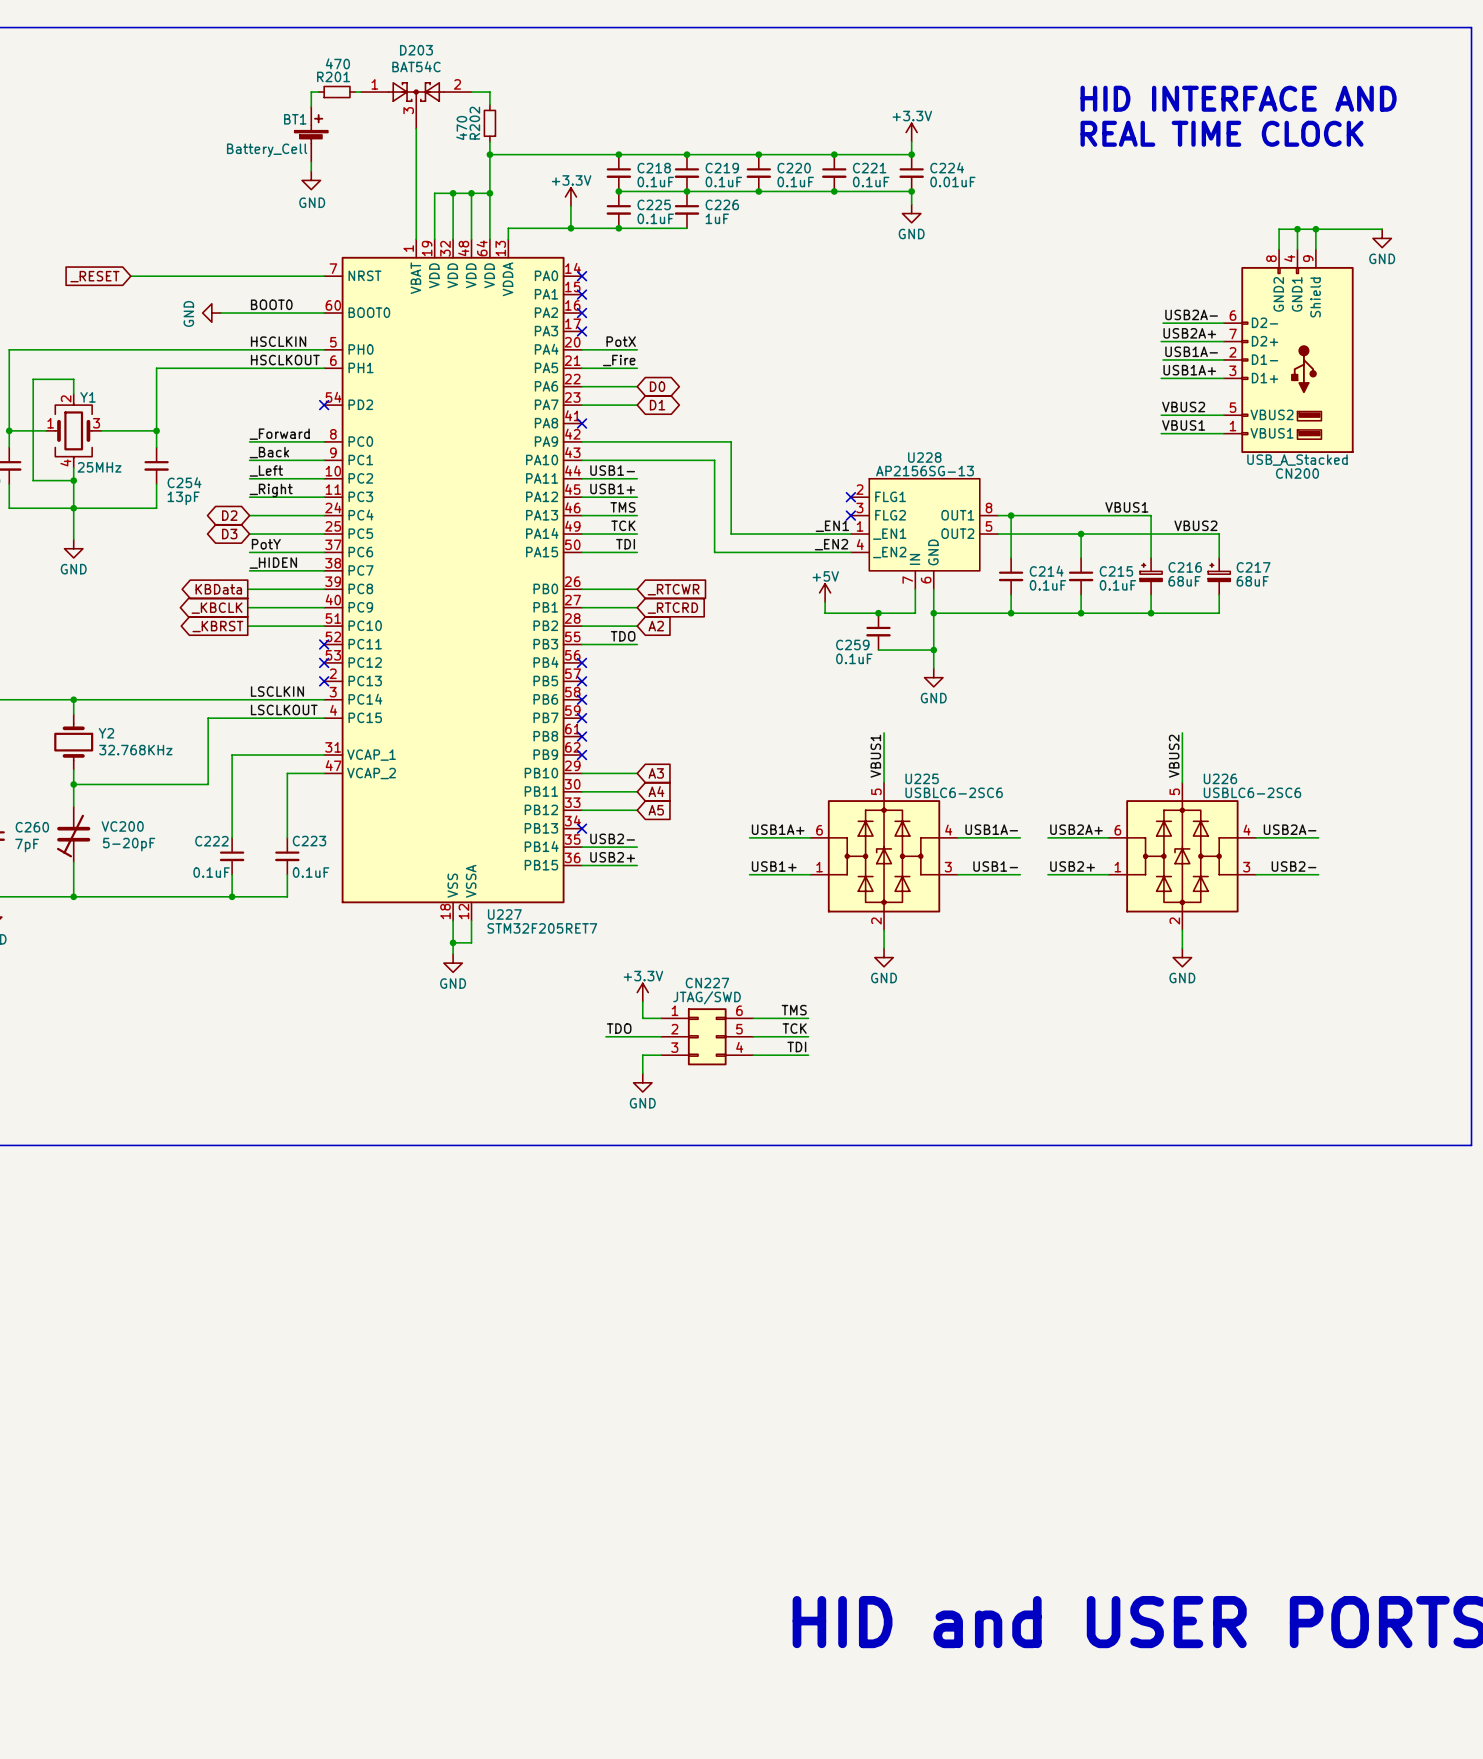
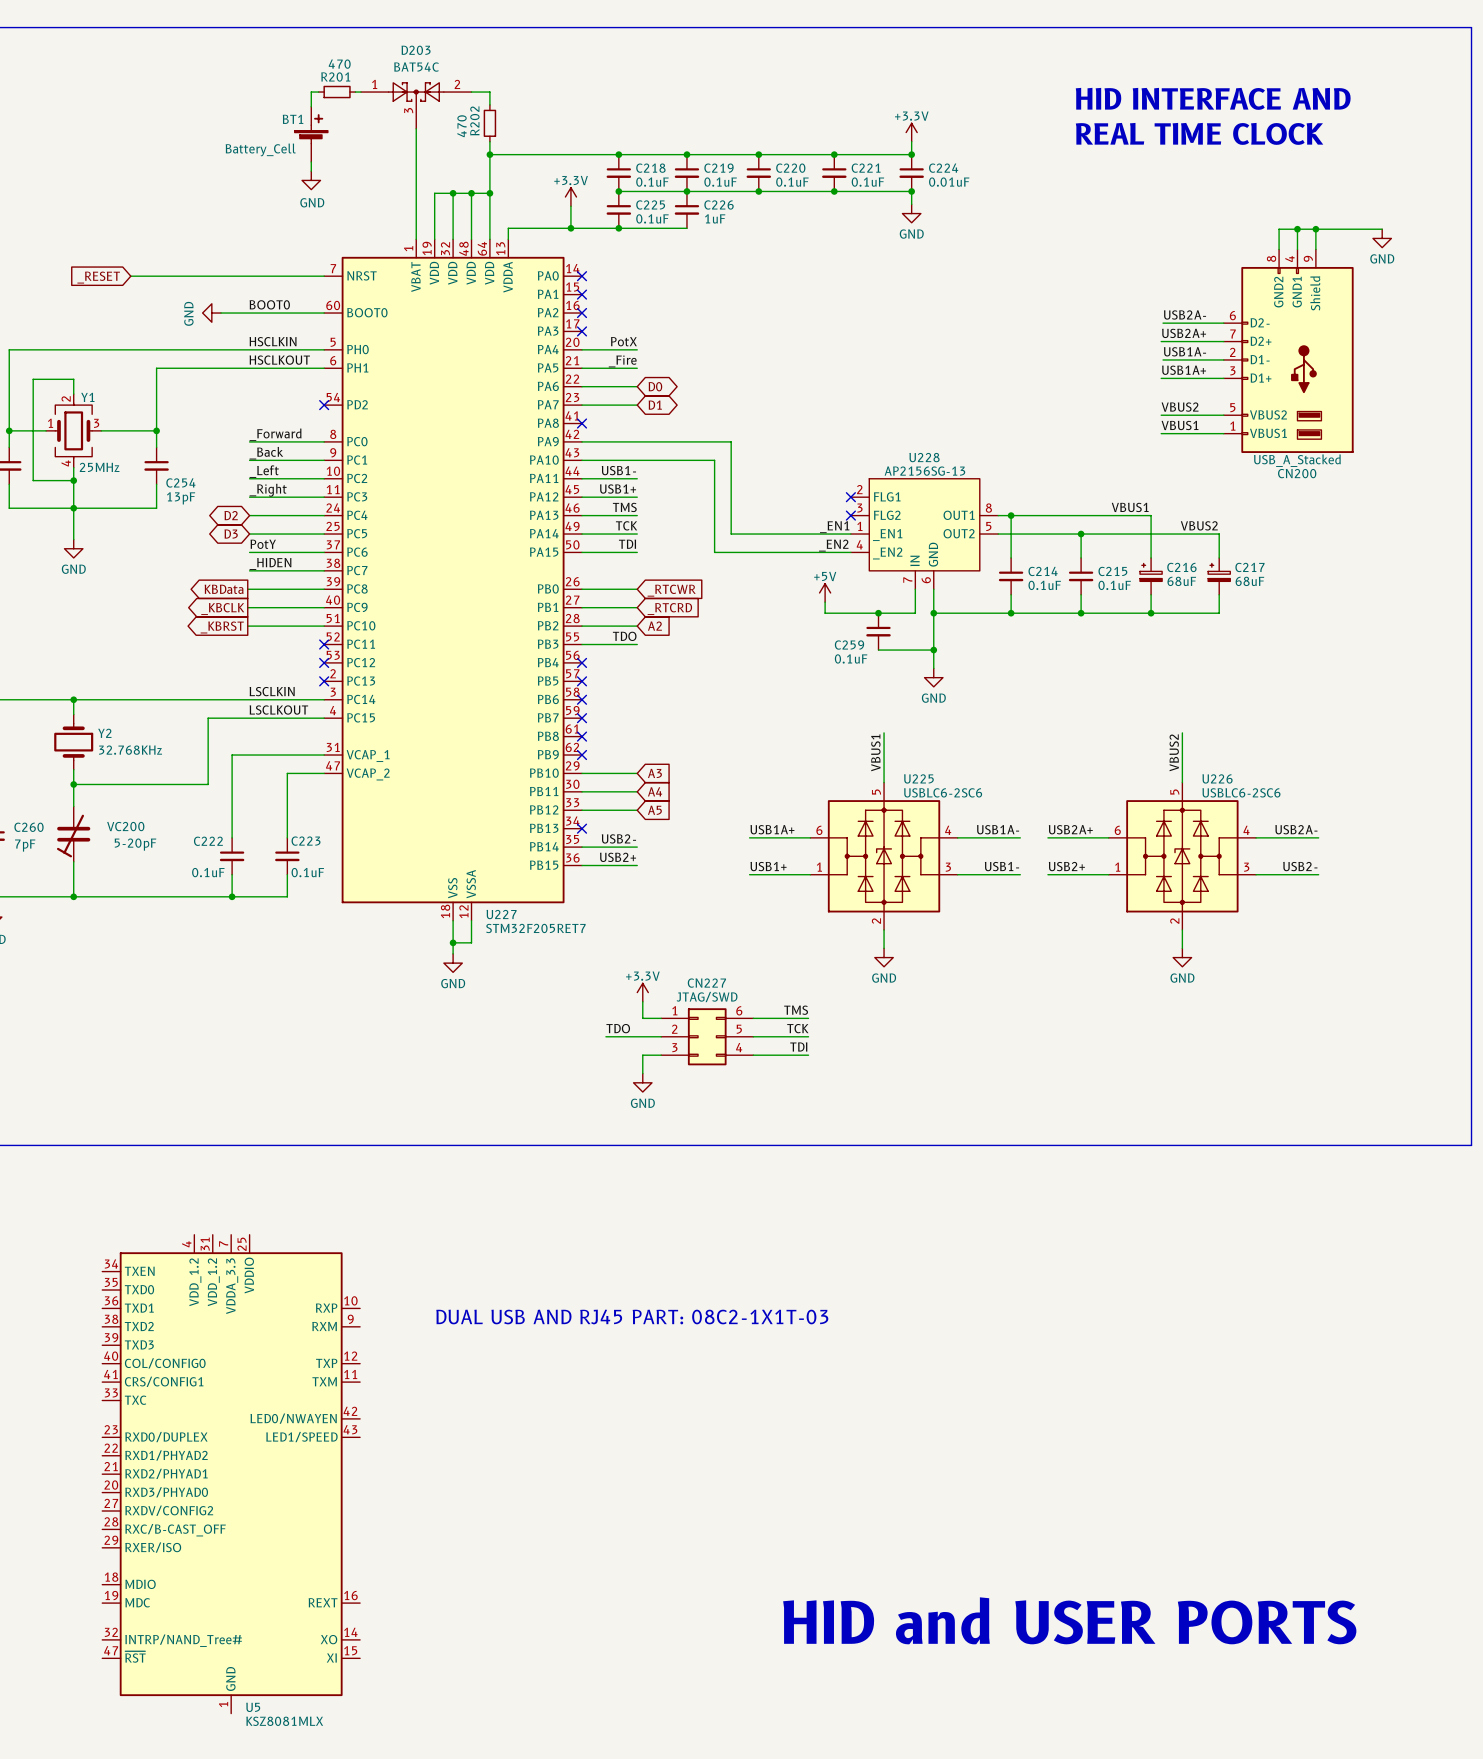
text: none -> DUAL USB AND RJ45 PART: 08C2-1X1T-03 (632, 1317)
U5: none -> KSZ8081MLX (231, 1474)

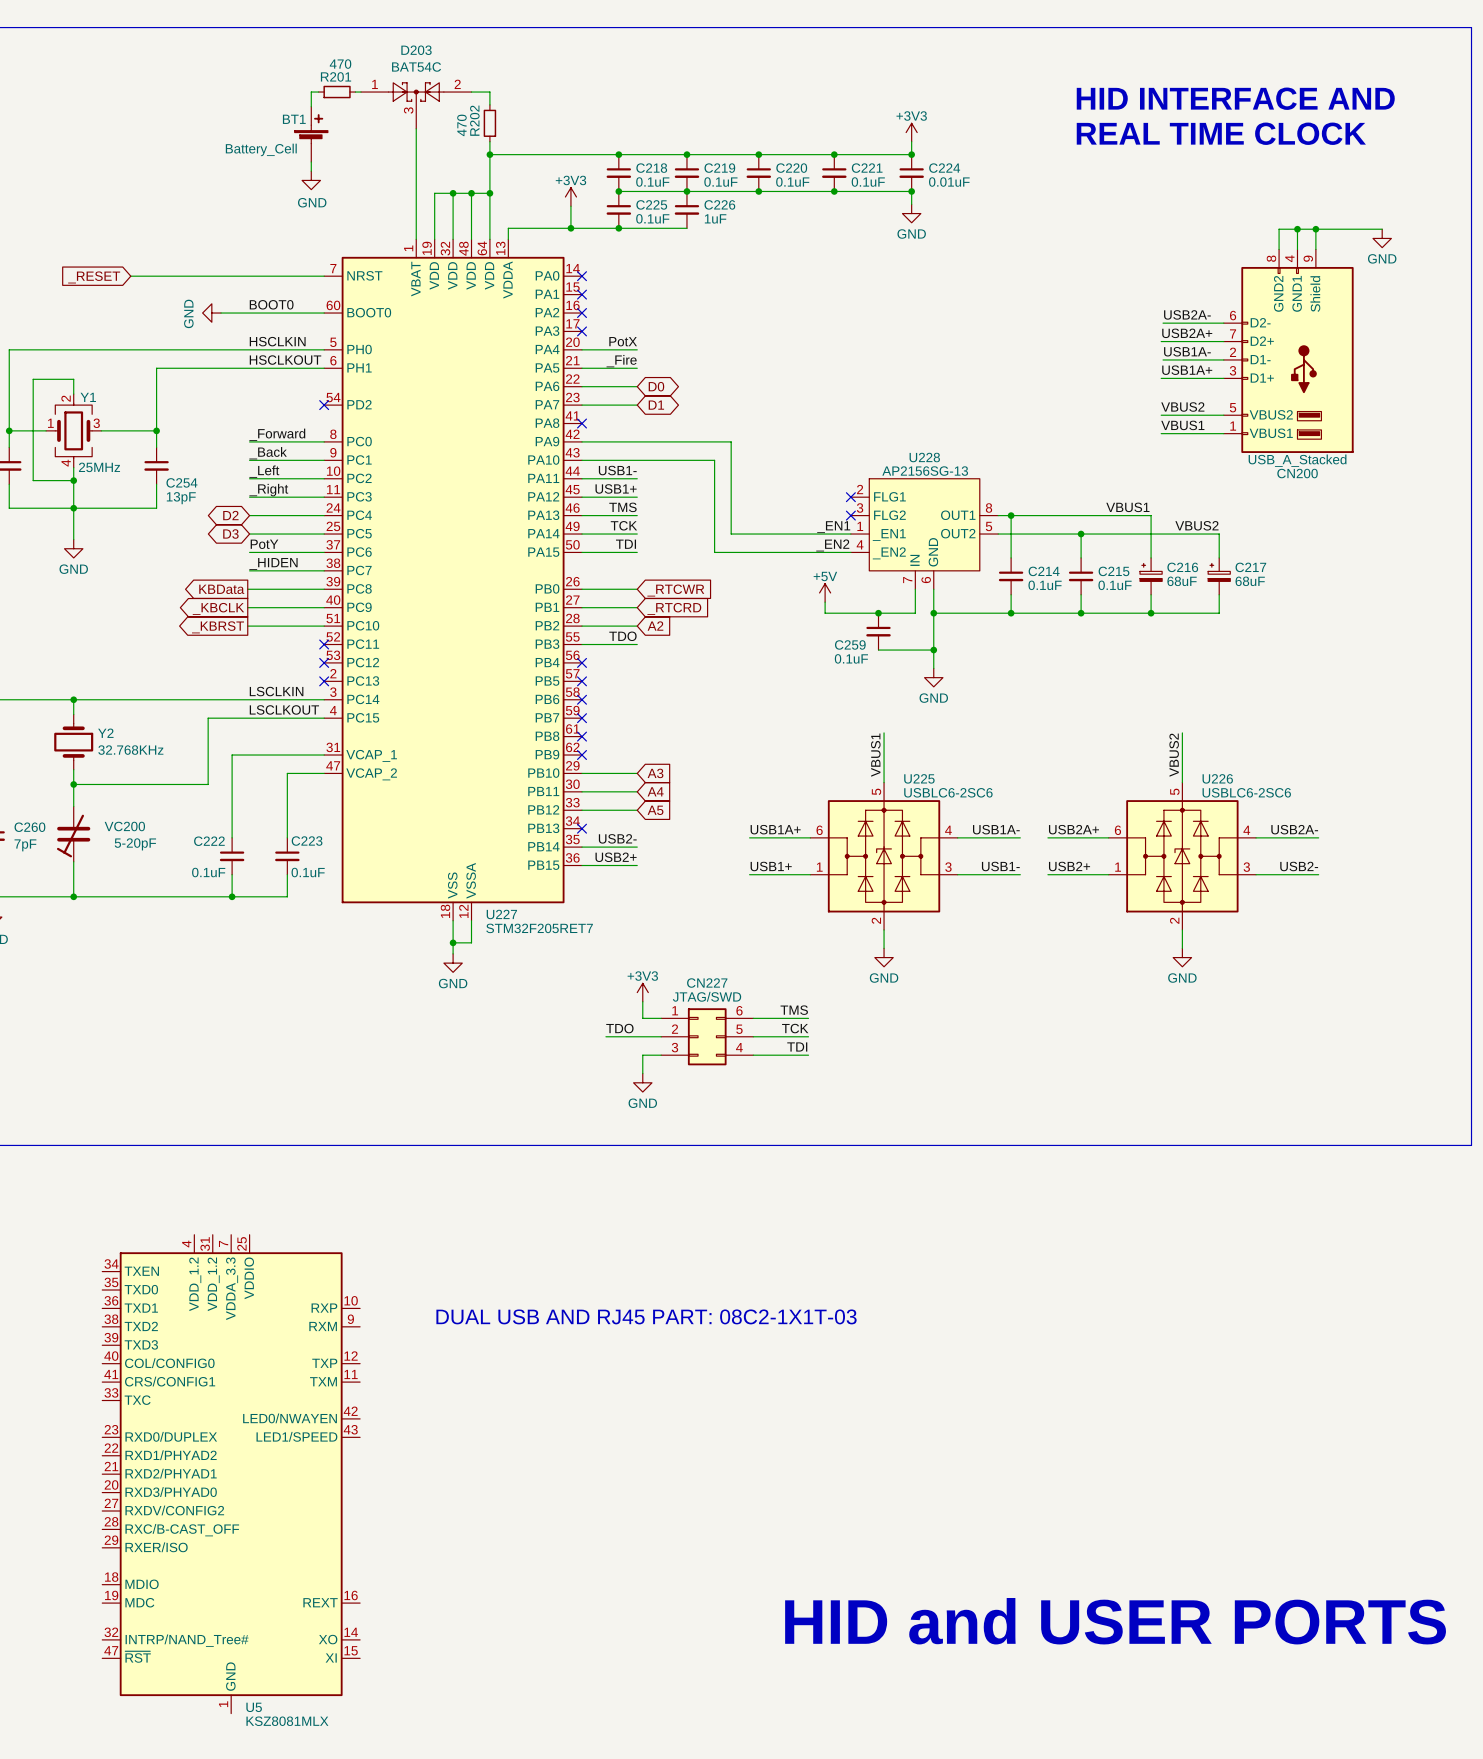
power symbol: +3.3V (911, 132) -> +3V3 (911, 132)
power symbol: +3.3V (570, 196) -> +3V3 (570, 196)
power symbol: +3.3V (642, 992) -> +3V3 (642, 992)

